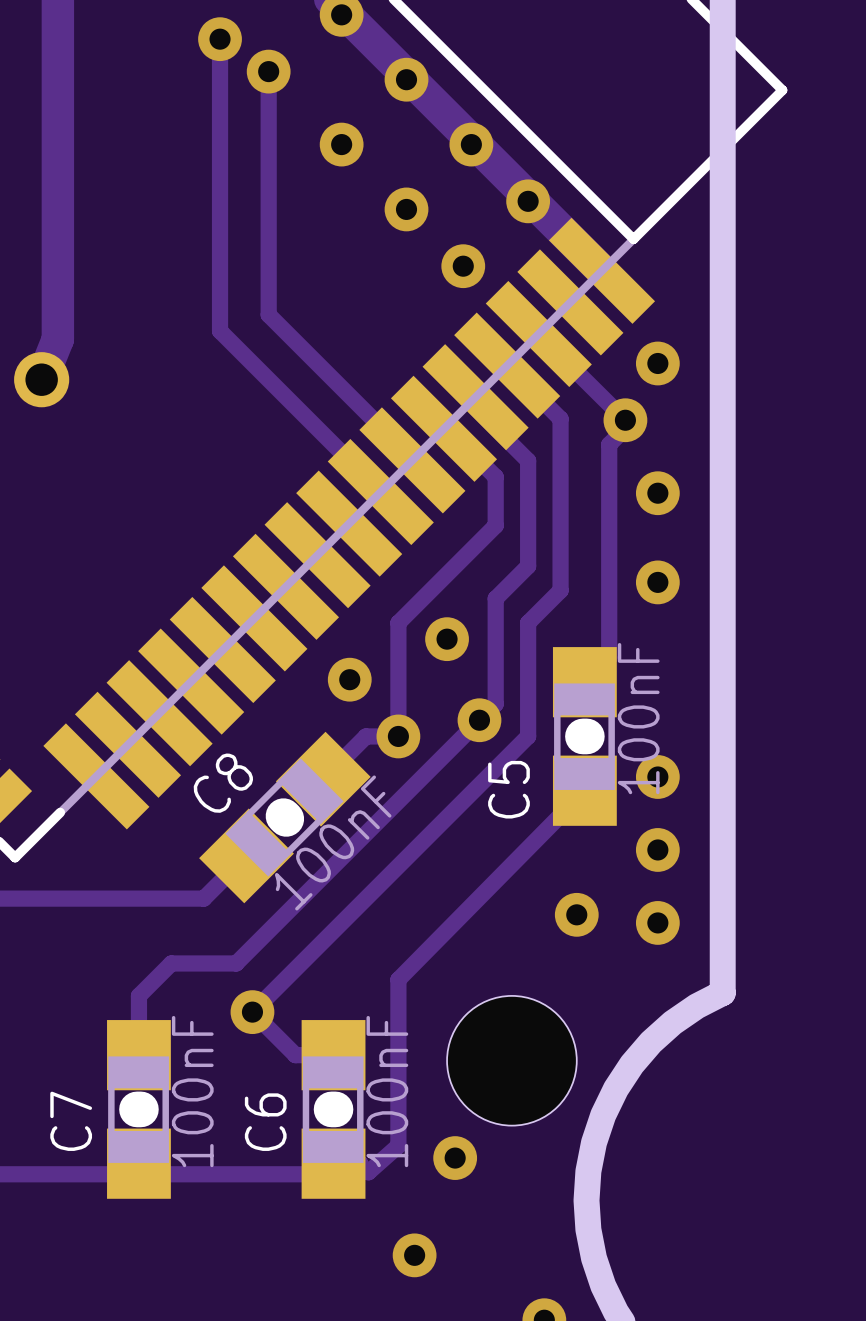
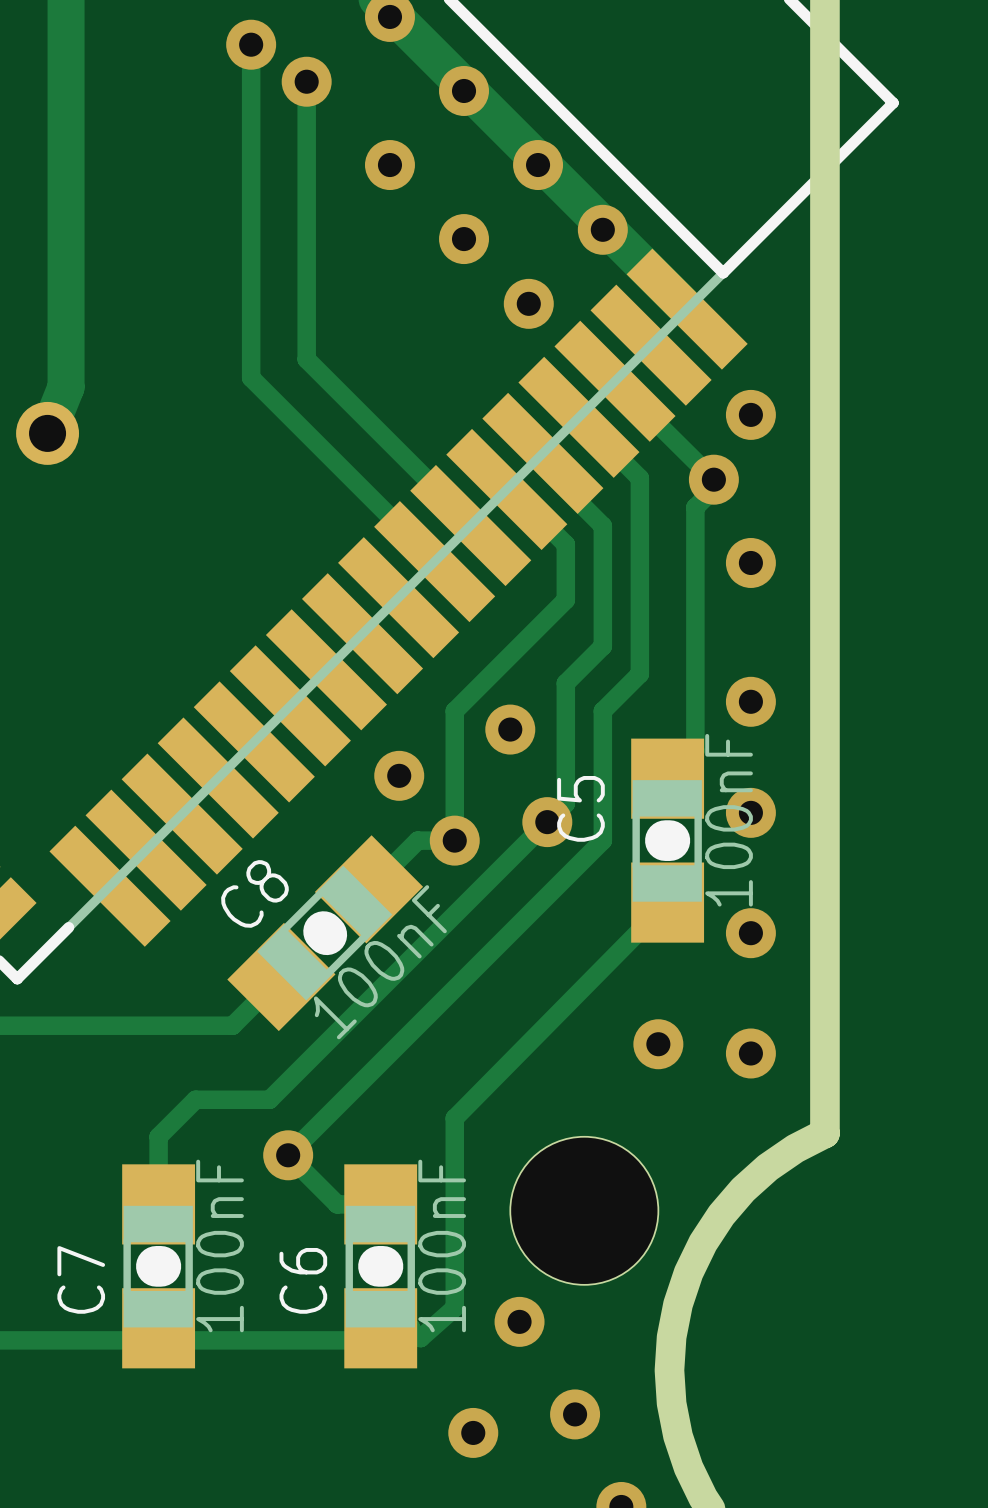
via position: (657, 582) -> (750, 701)
via: none -> (750, 812)
via: (657, 776) -> none
C5 name position: C5 (508, 789) -> C5 (580, 808)
via: none -> (750, 933)
via: (657, 849) -> none
via: none -> (575, 1414)

